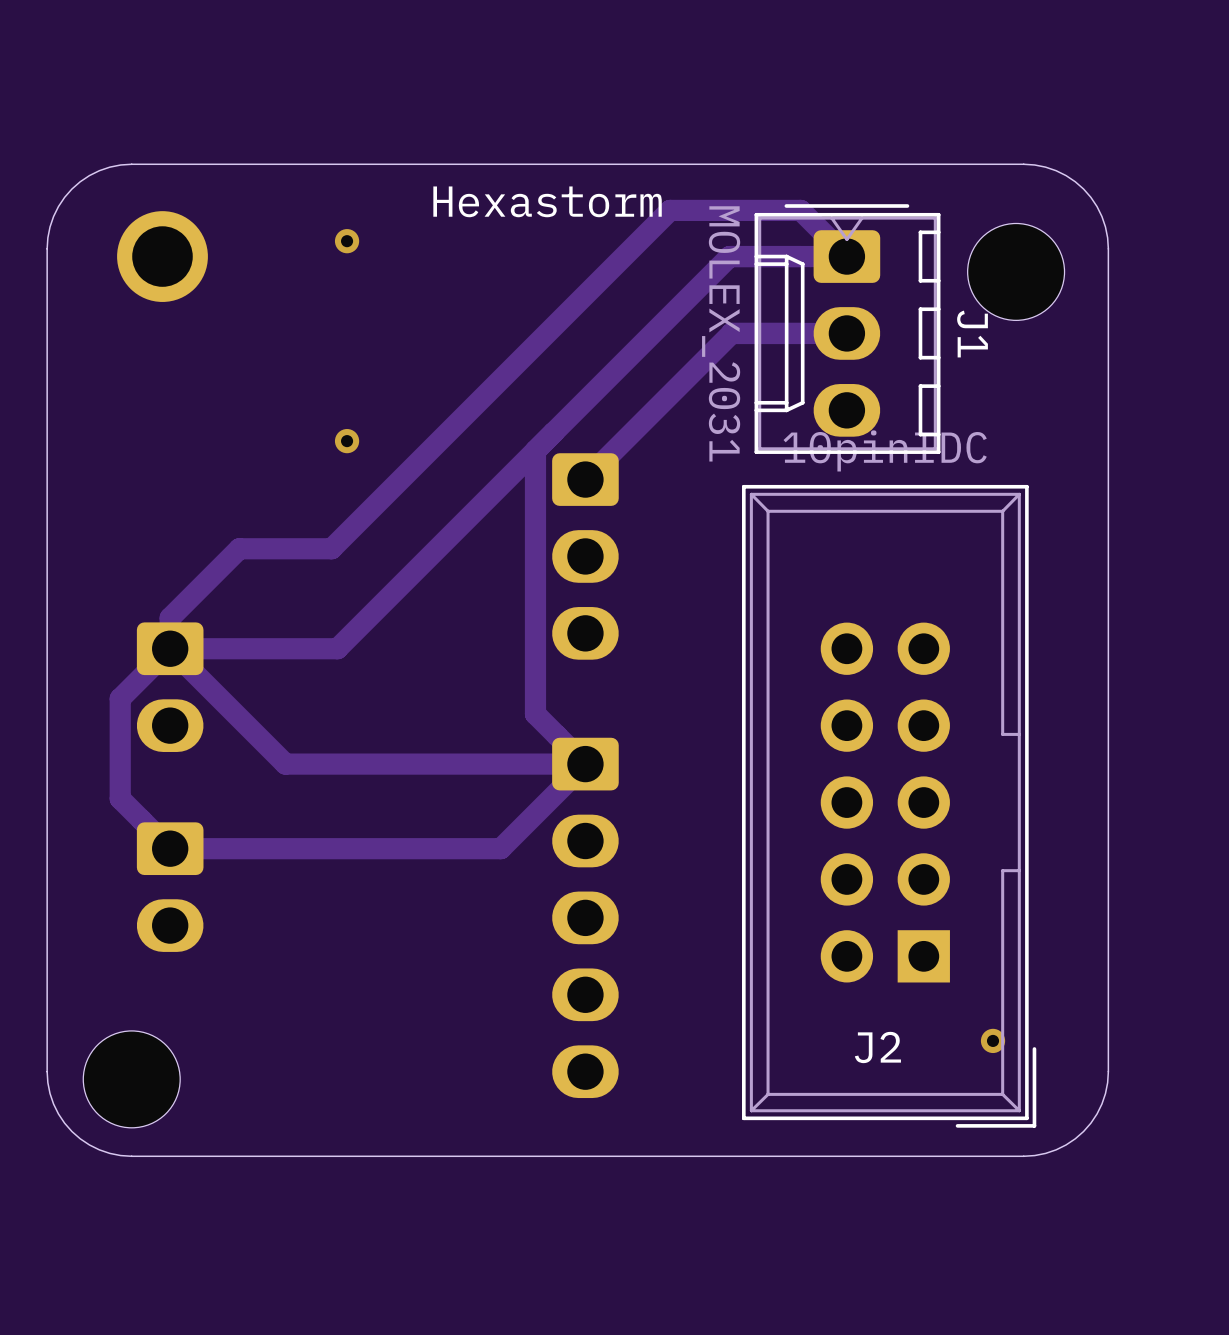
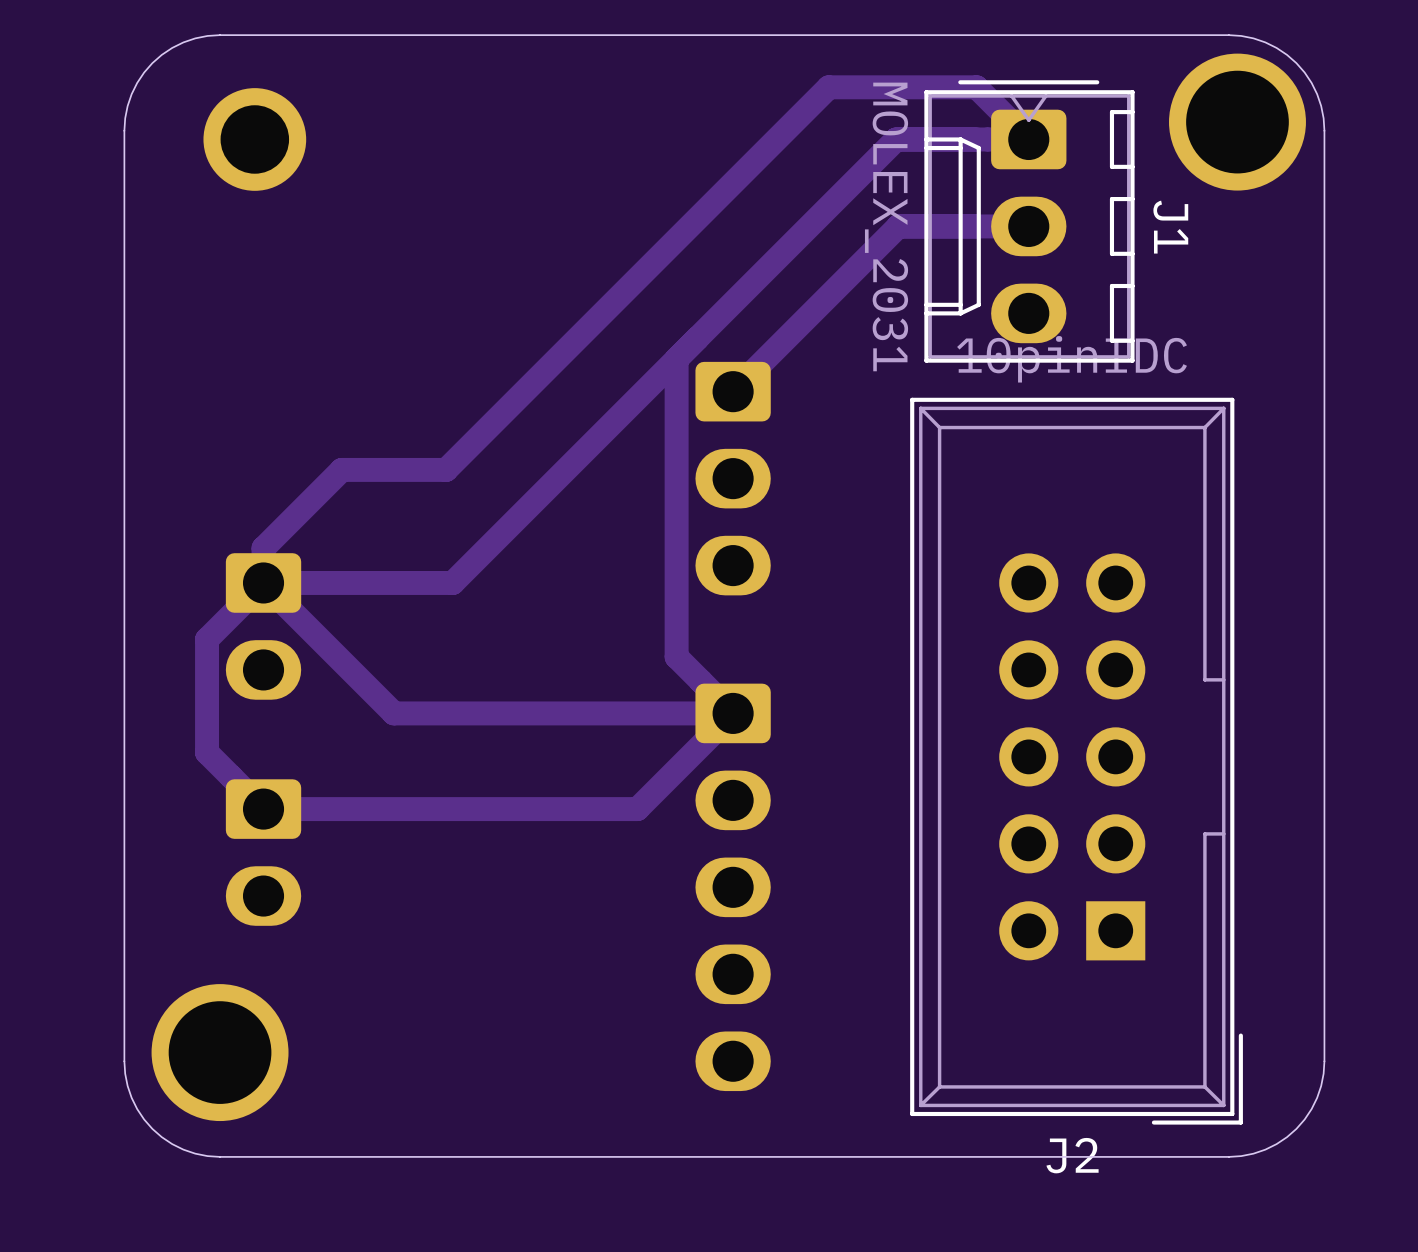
text: Hexastorm (547, 201) -> none
via: (347, 241) -> none
part: none -> (1237, 122)
part: (1016, 271) -> none
via: (347, 441) -> none
part footprint: [83, 1030, 181, 1128] -> [151, 984, 289, 1122]
via: (993, 1040) -> none
J2 name position: J2 (877, 1047) -> J2 (1072, 1155)

